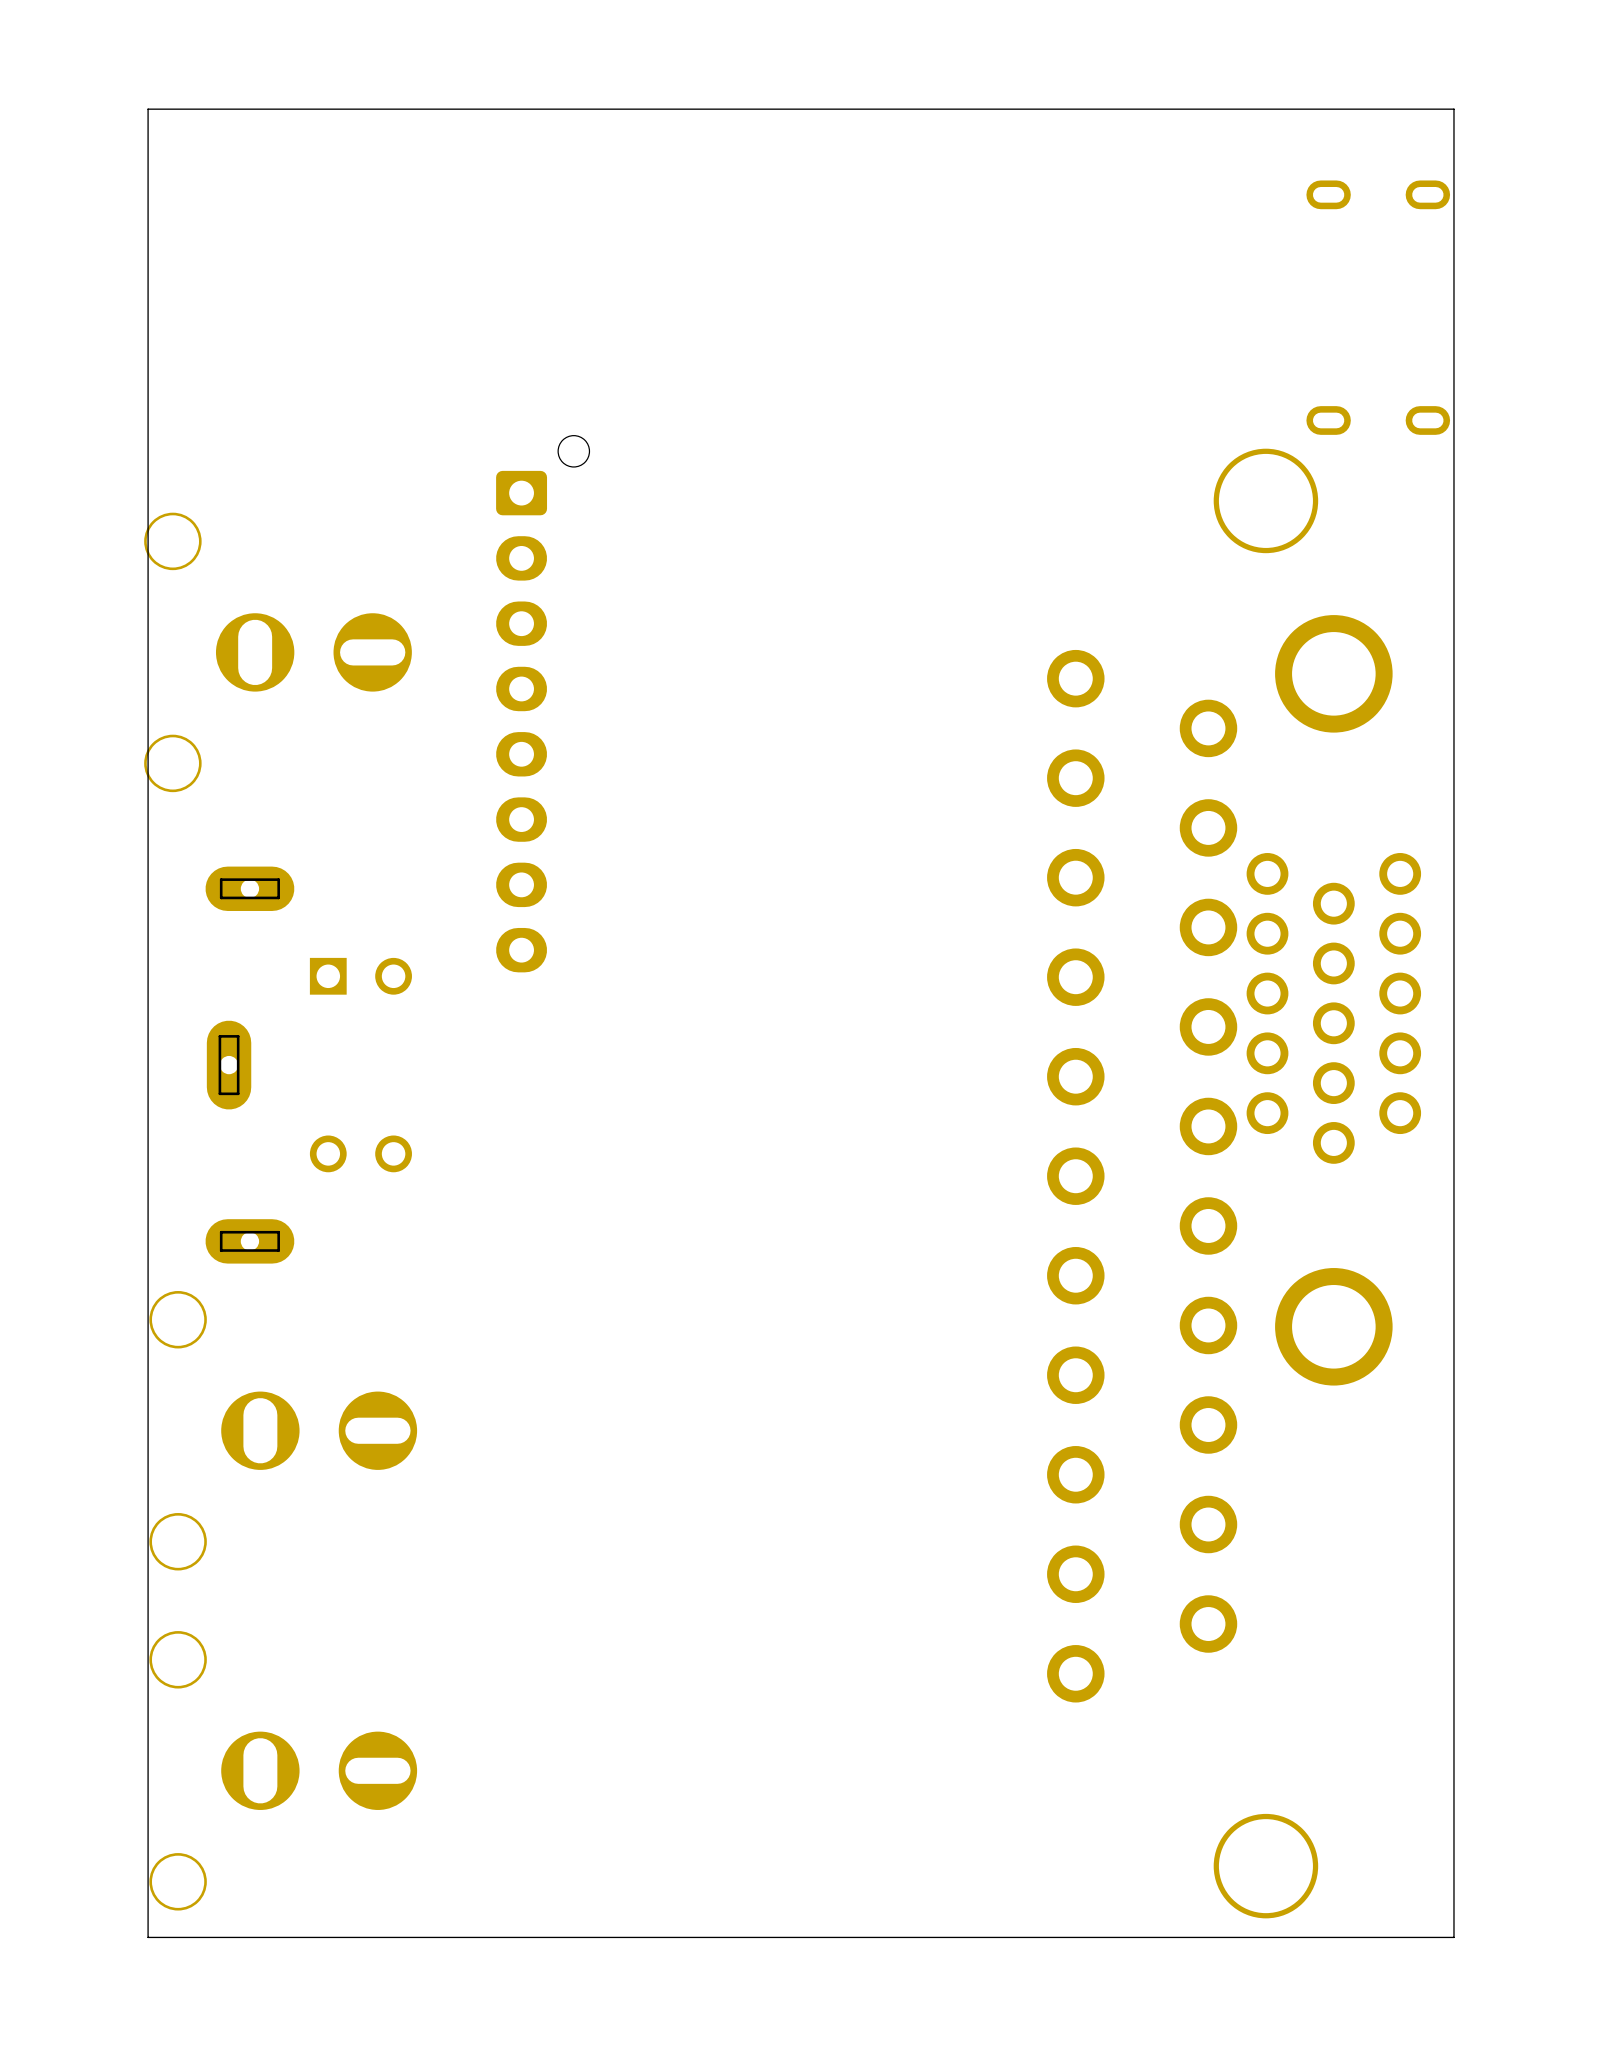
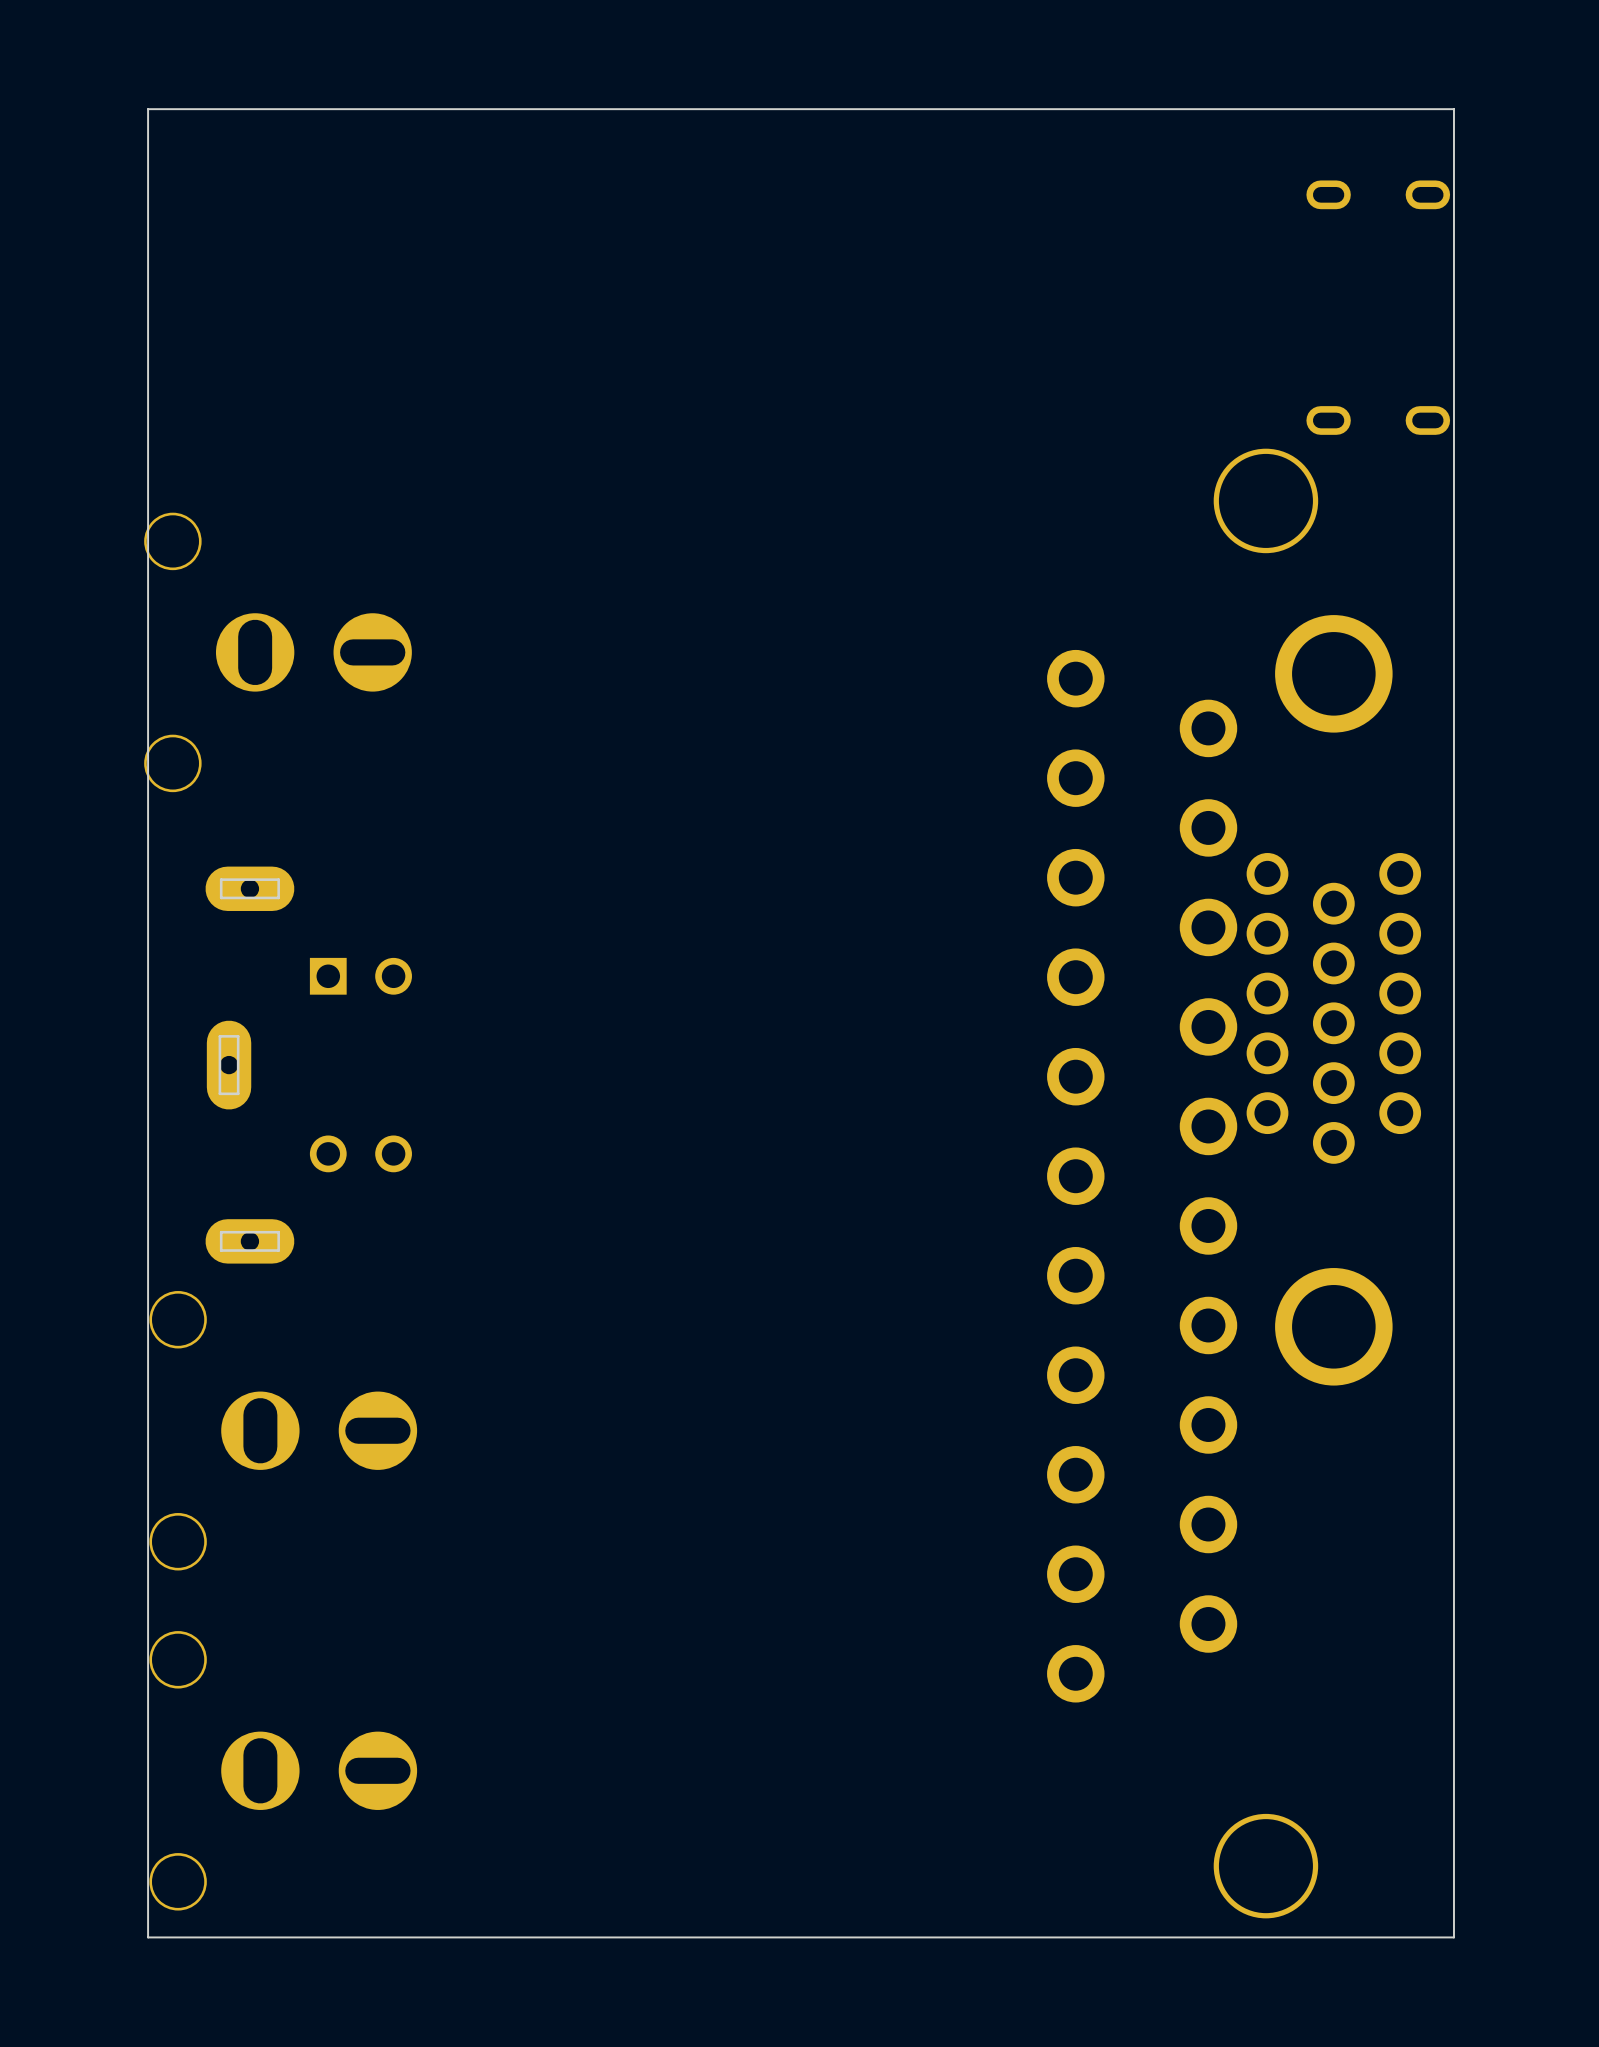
part: (542, 704) -> none

